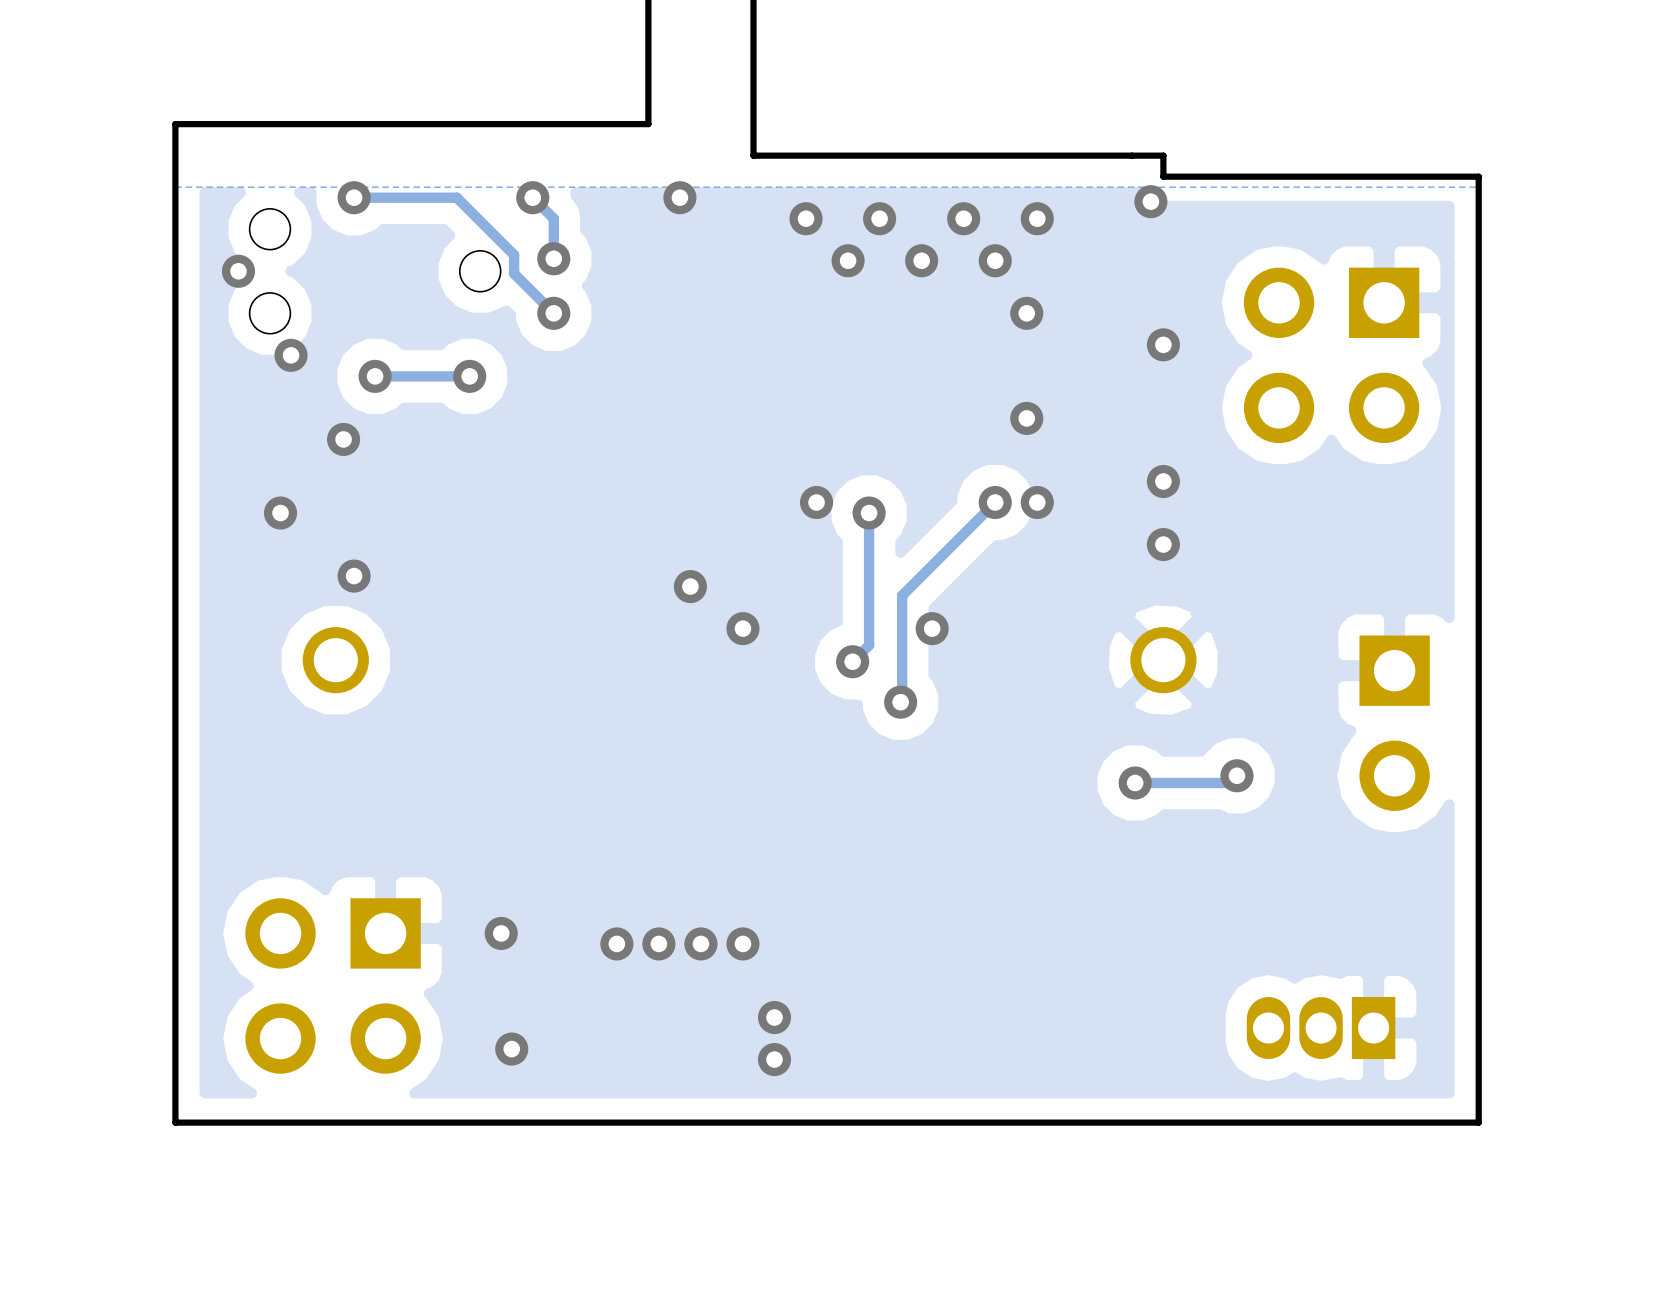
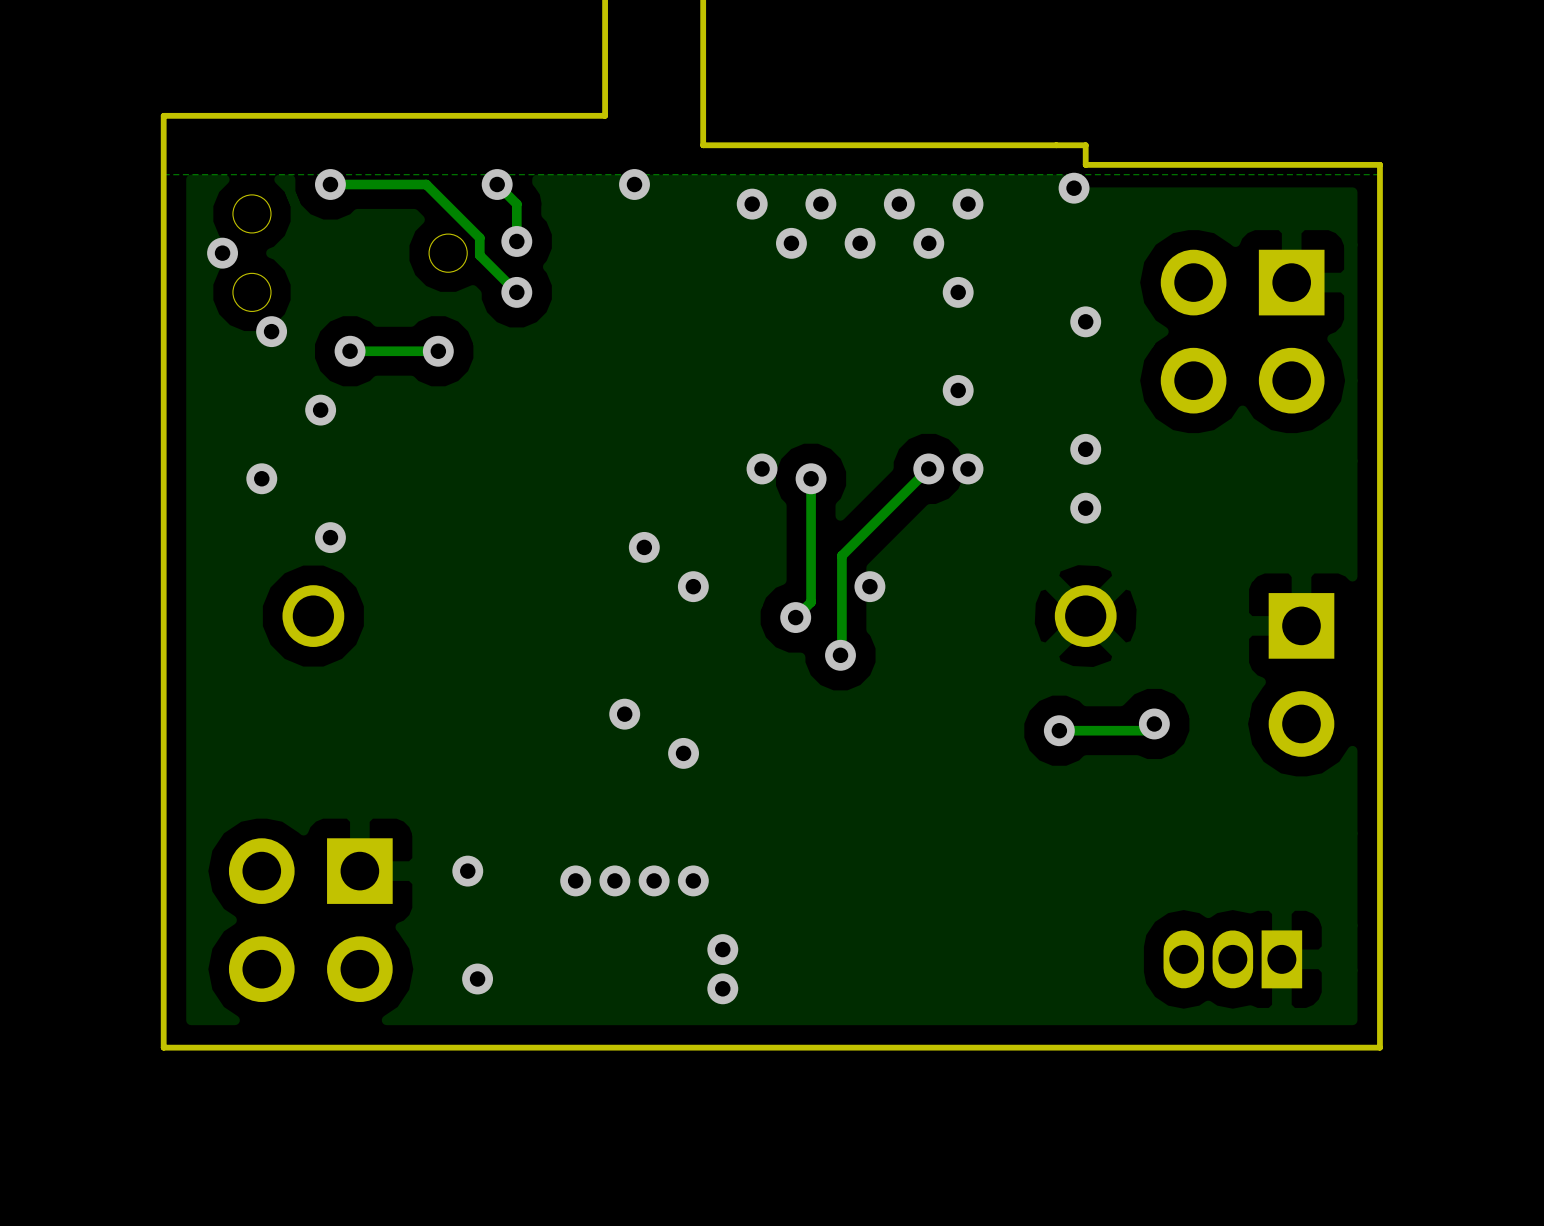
via: none -> (624, 714)
via: none -> (683, 753)

